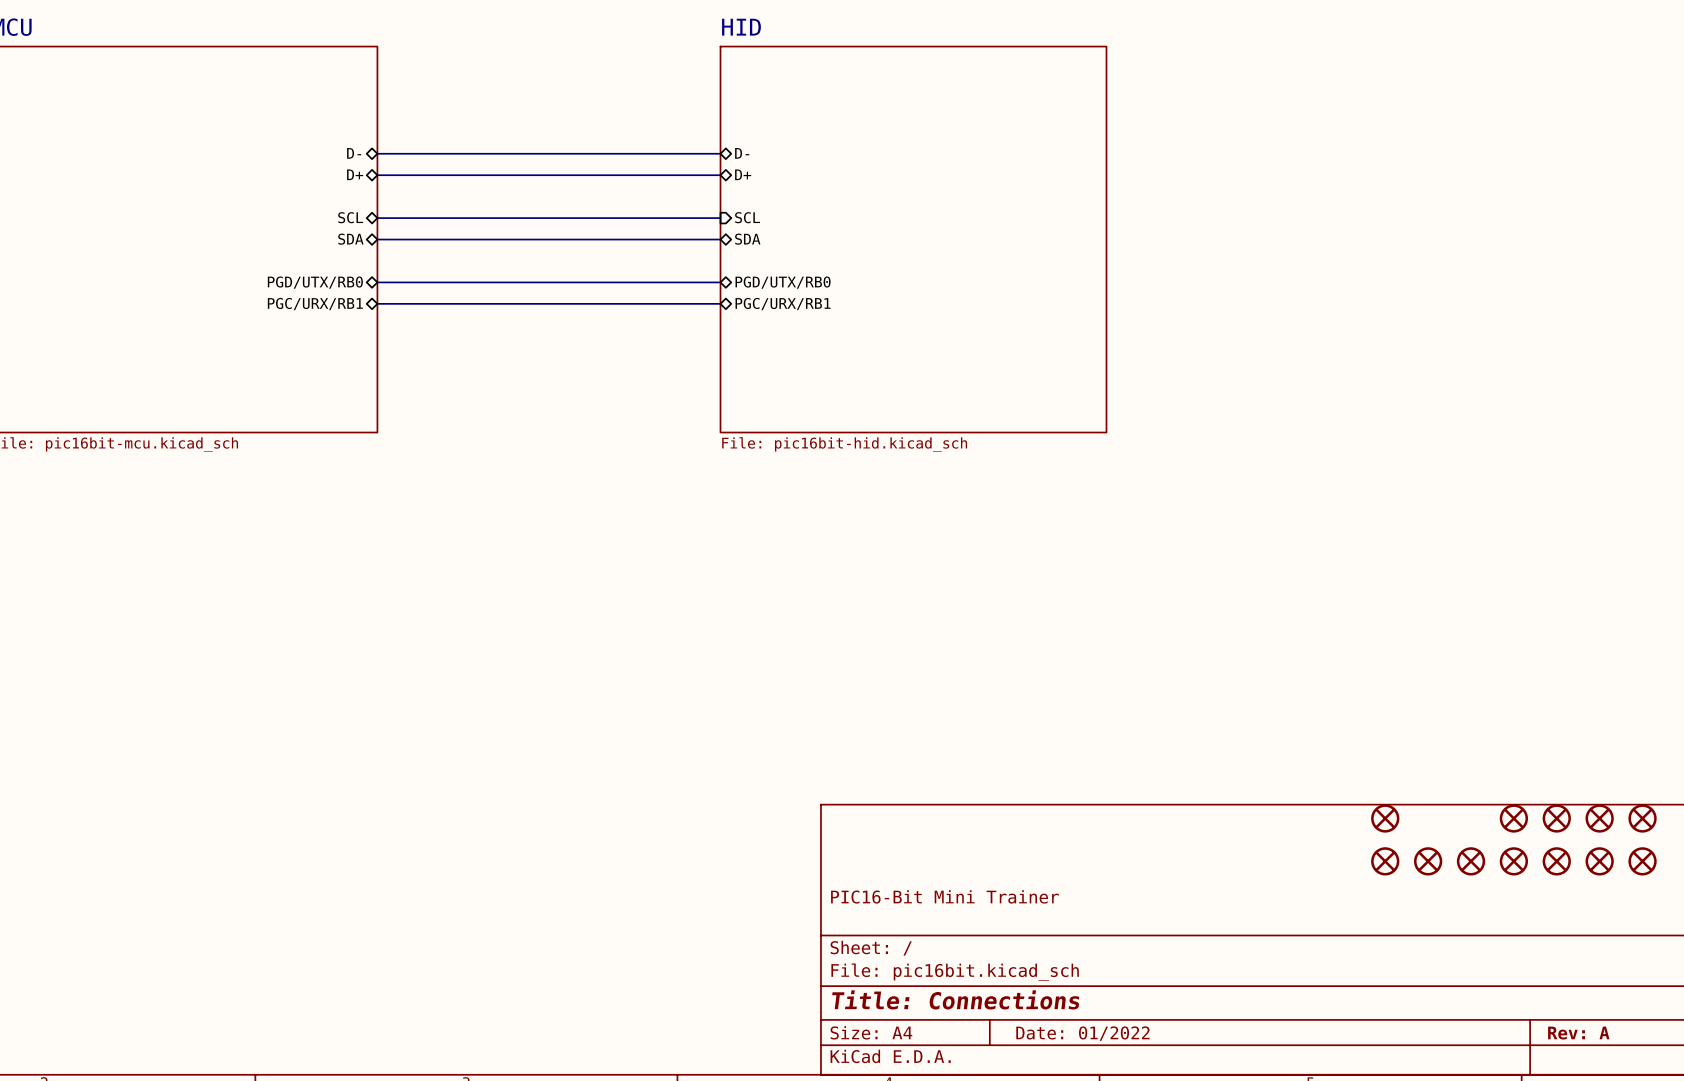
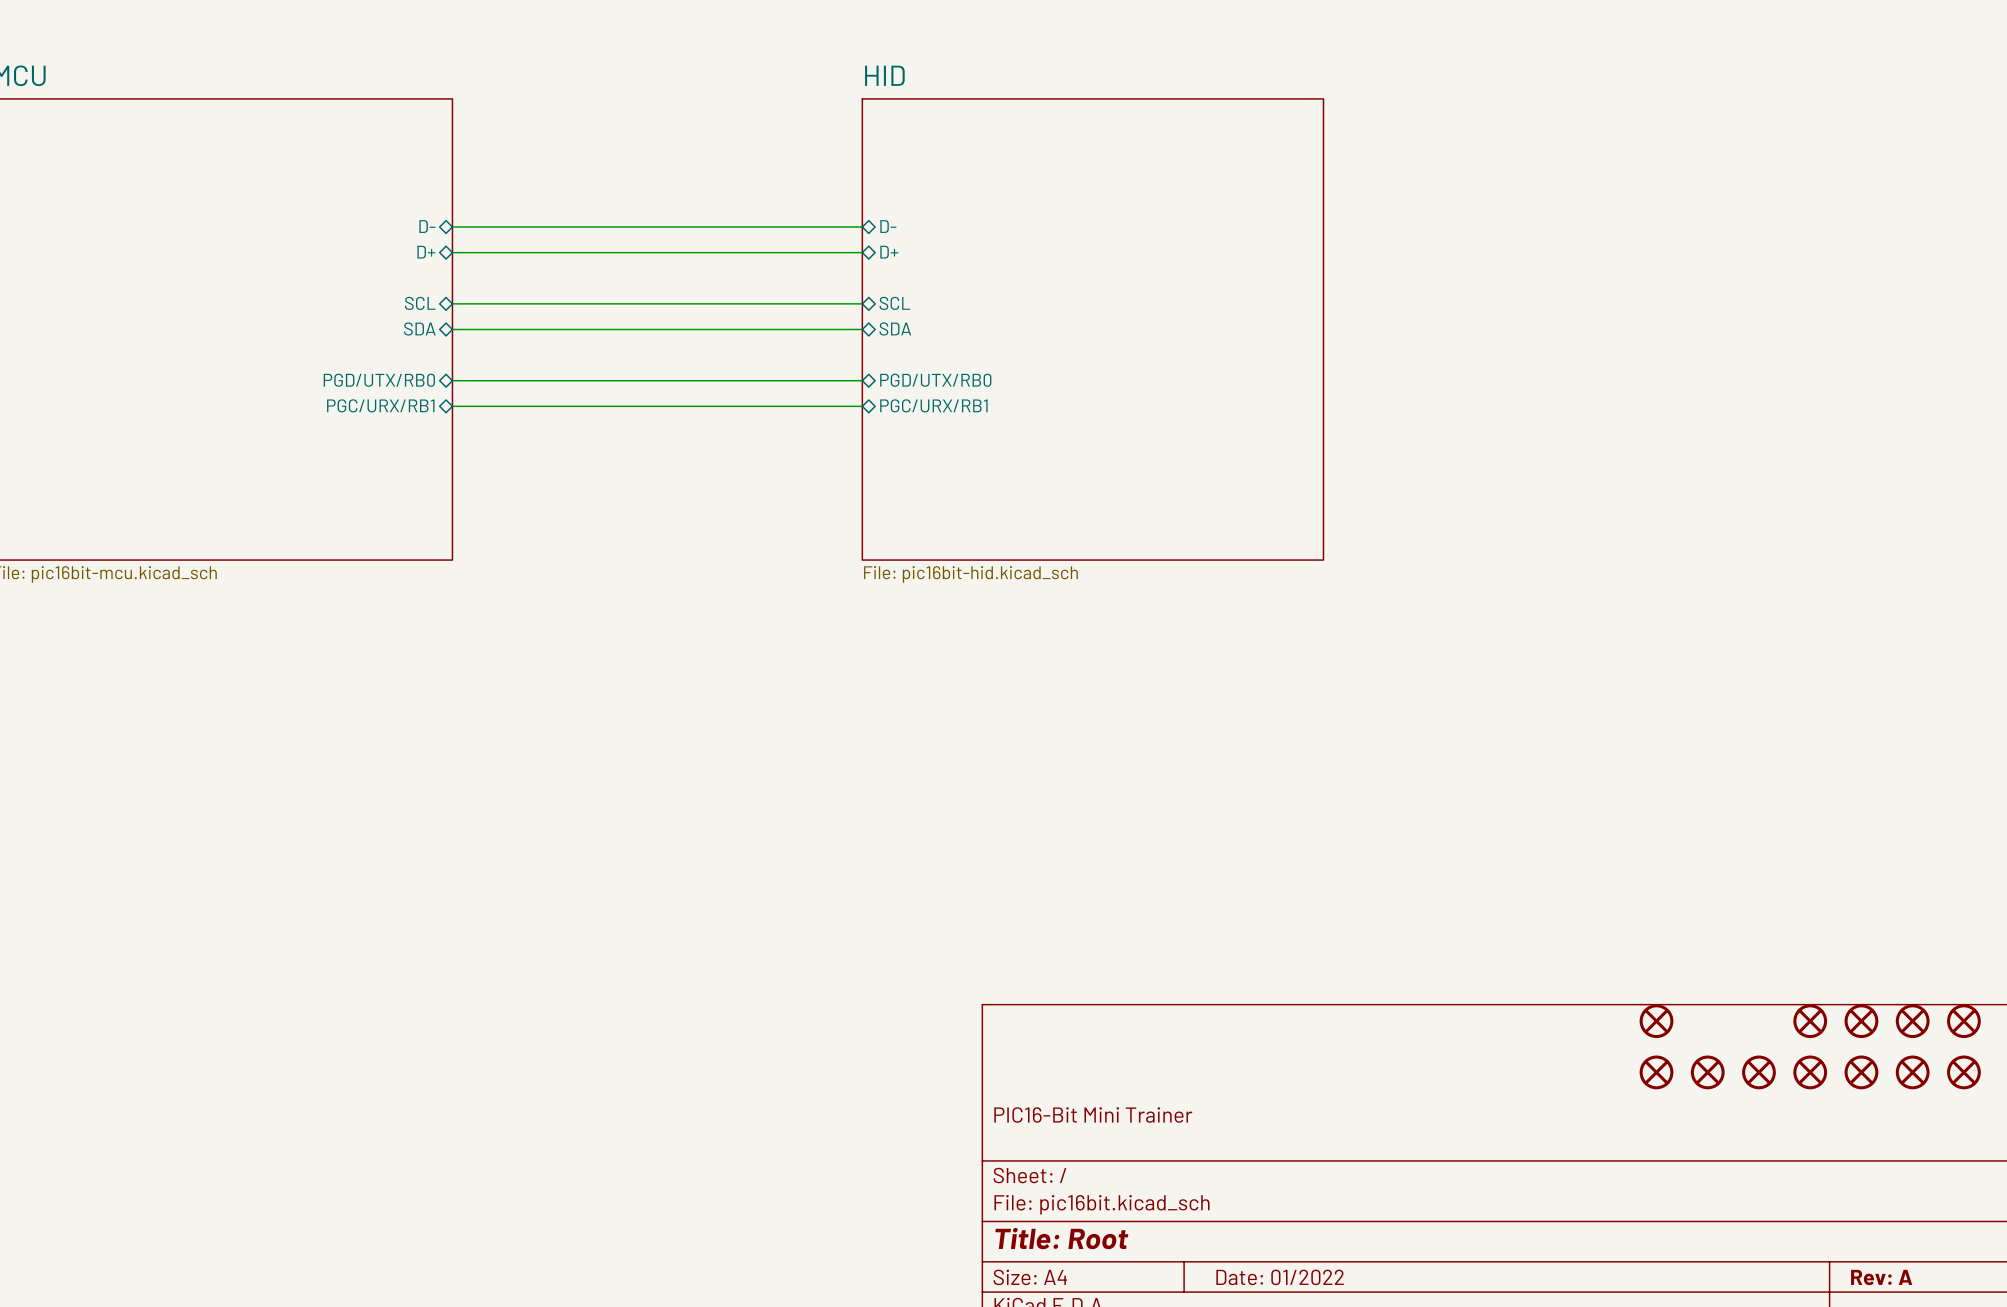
sheet pin shape: input (747, 217) -> bidirectional (894, 303)
title block: Title: Connections (955, 999) -> Title: Root (1061, 1238)

